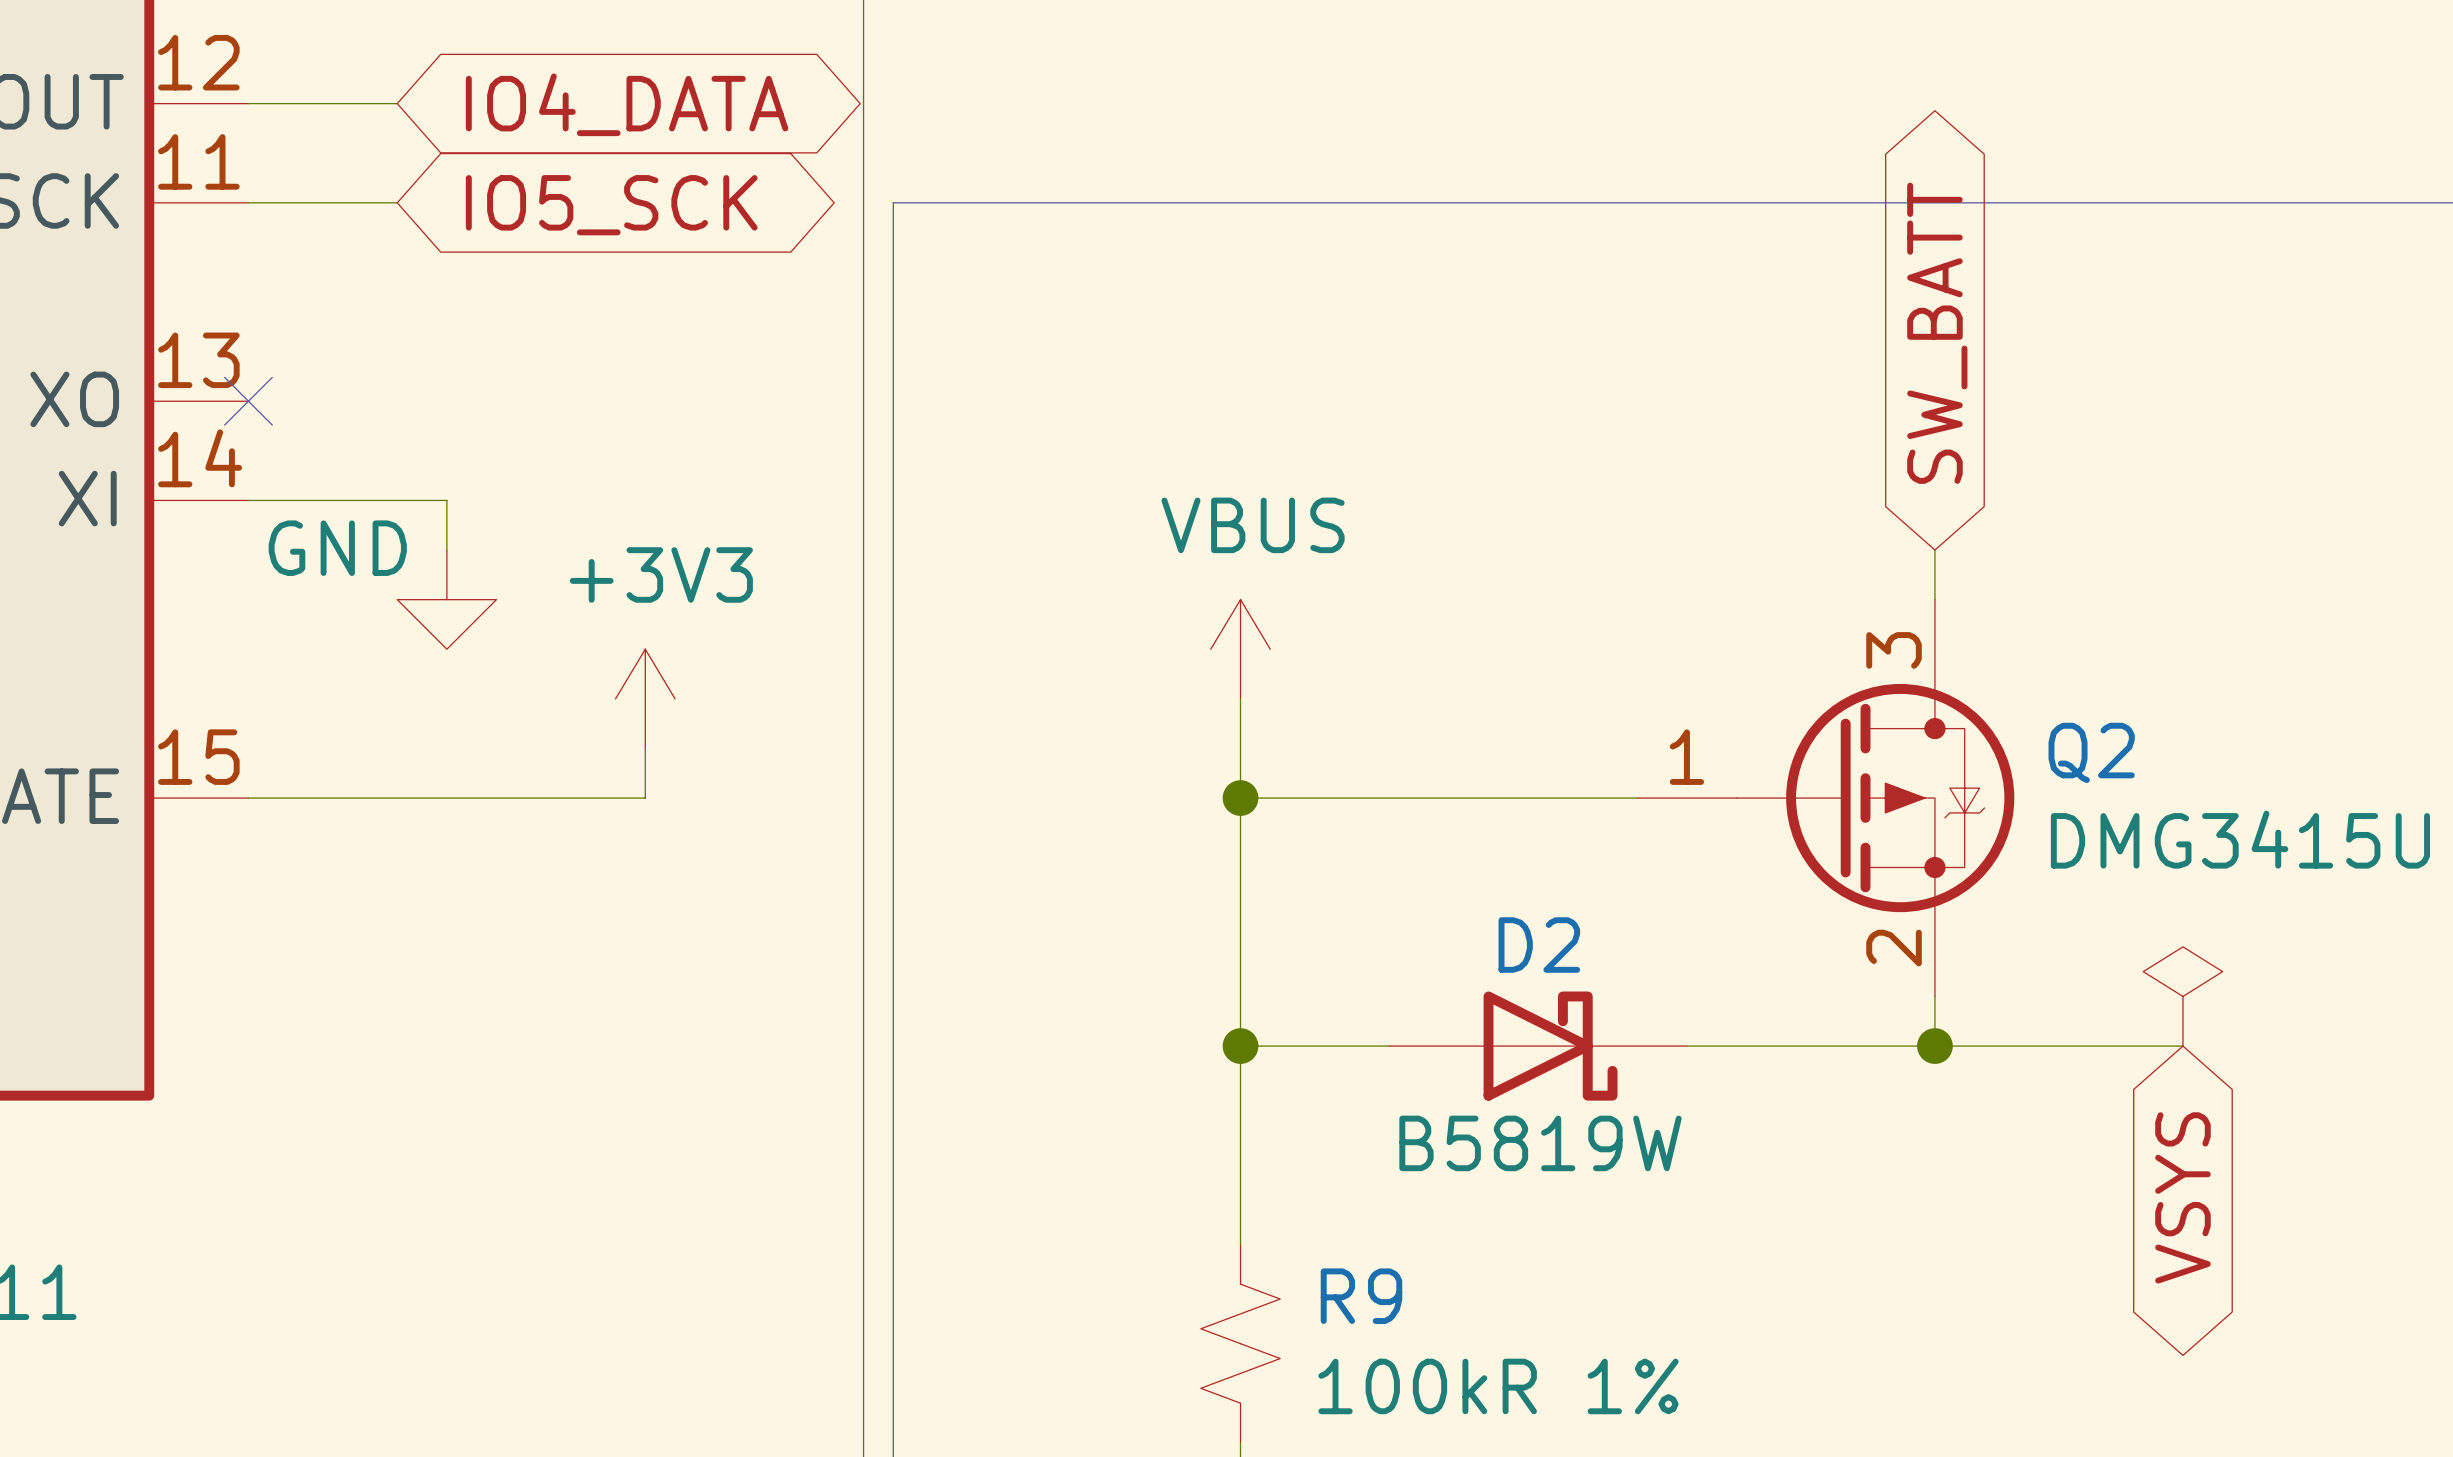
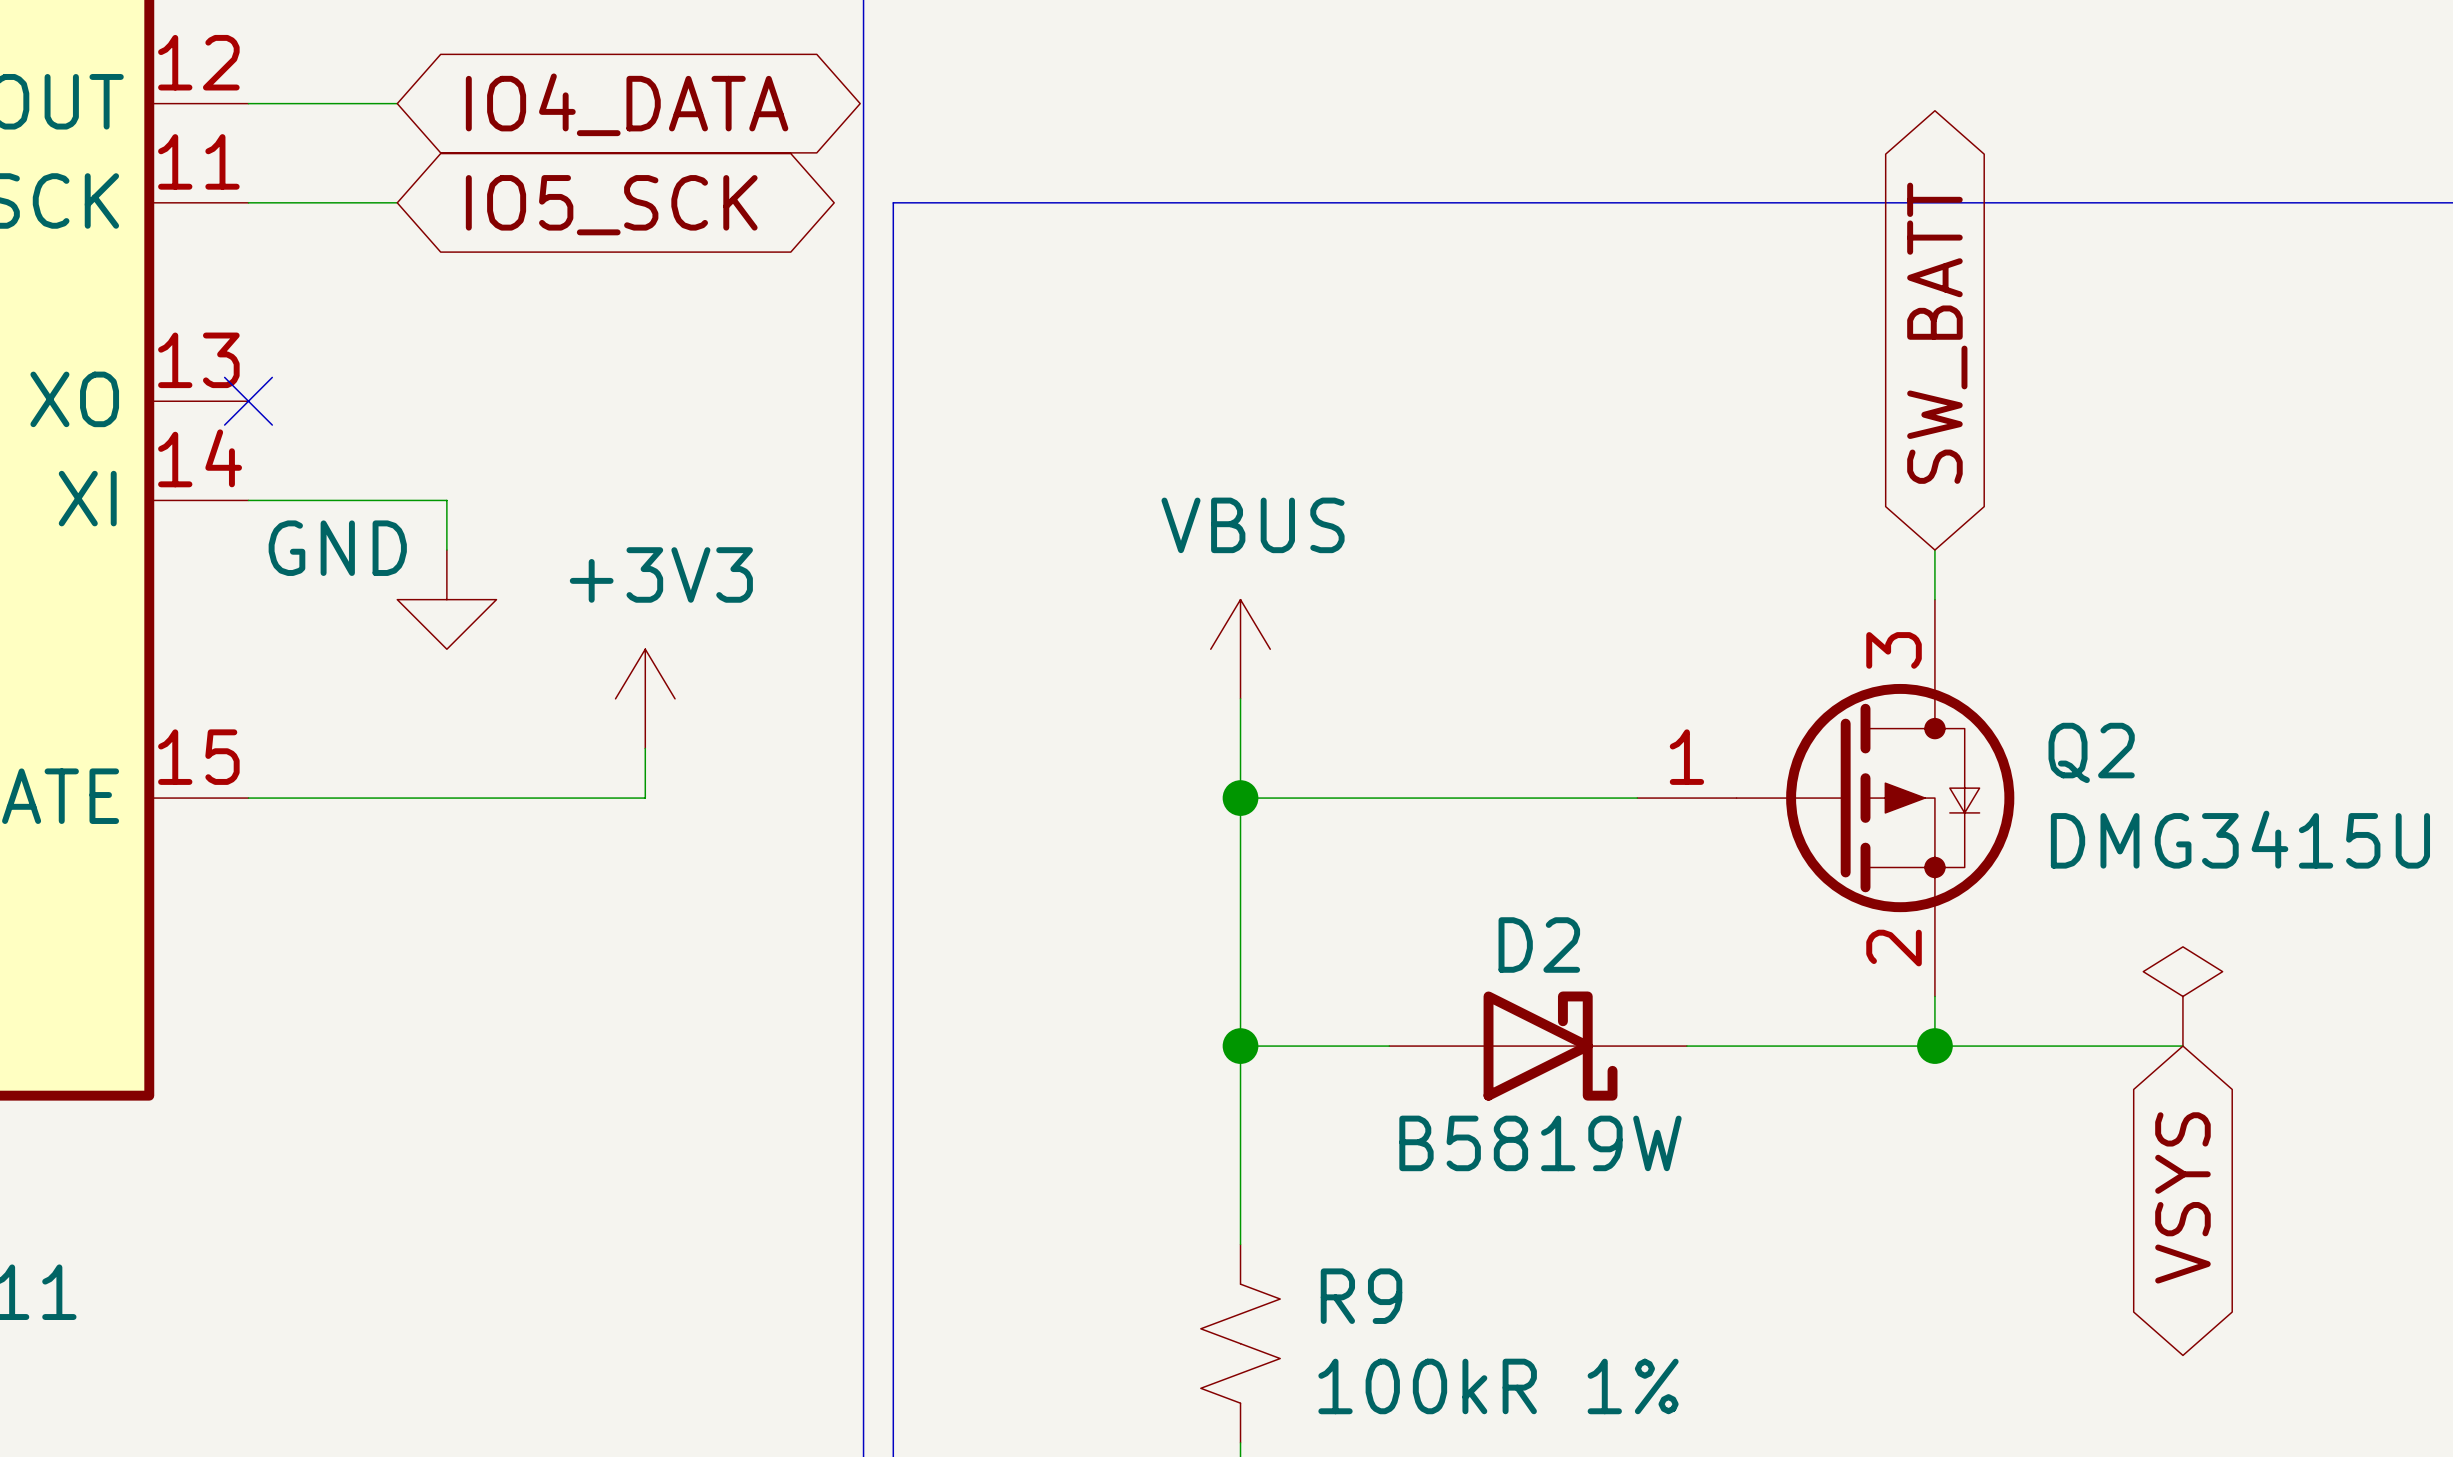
Q2 symbol: [1637, 599, 2015, 997] -> [1637, 599, 2015, 997]

